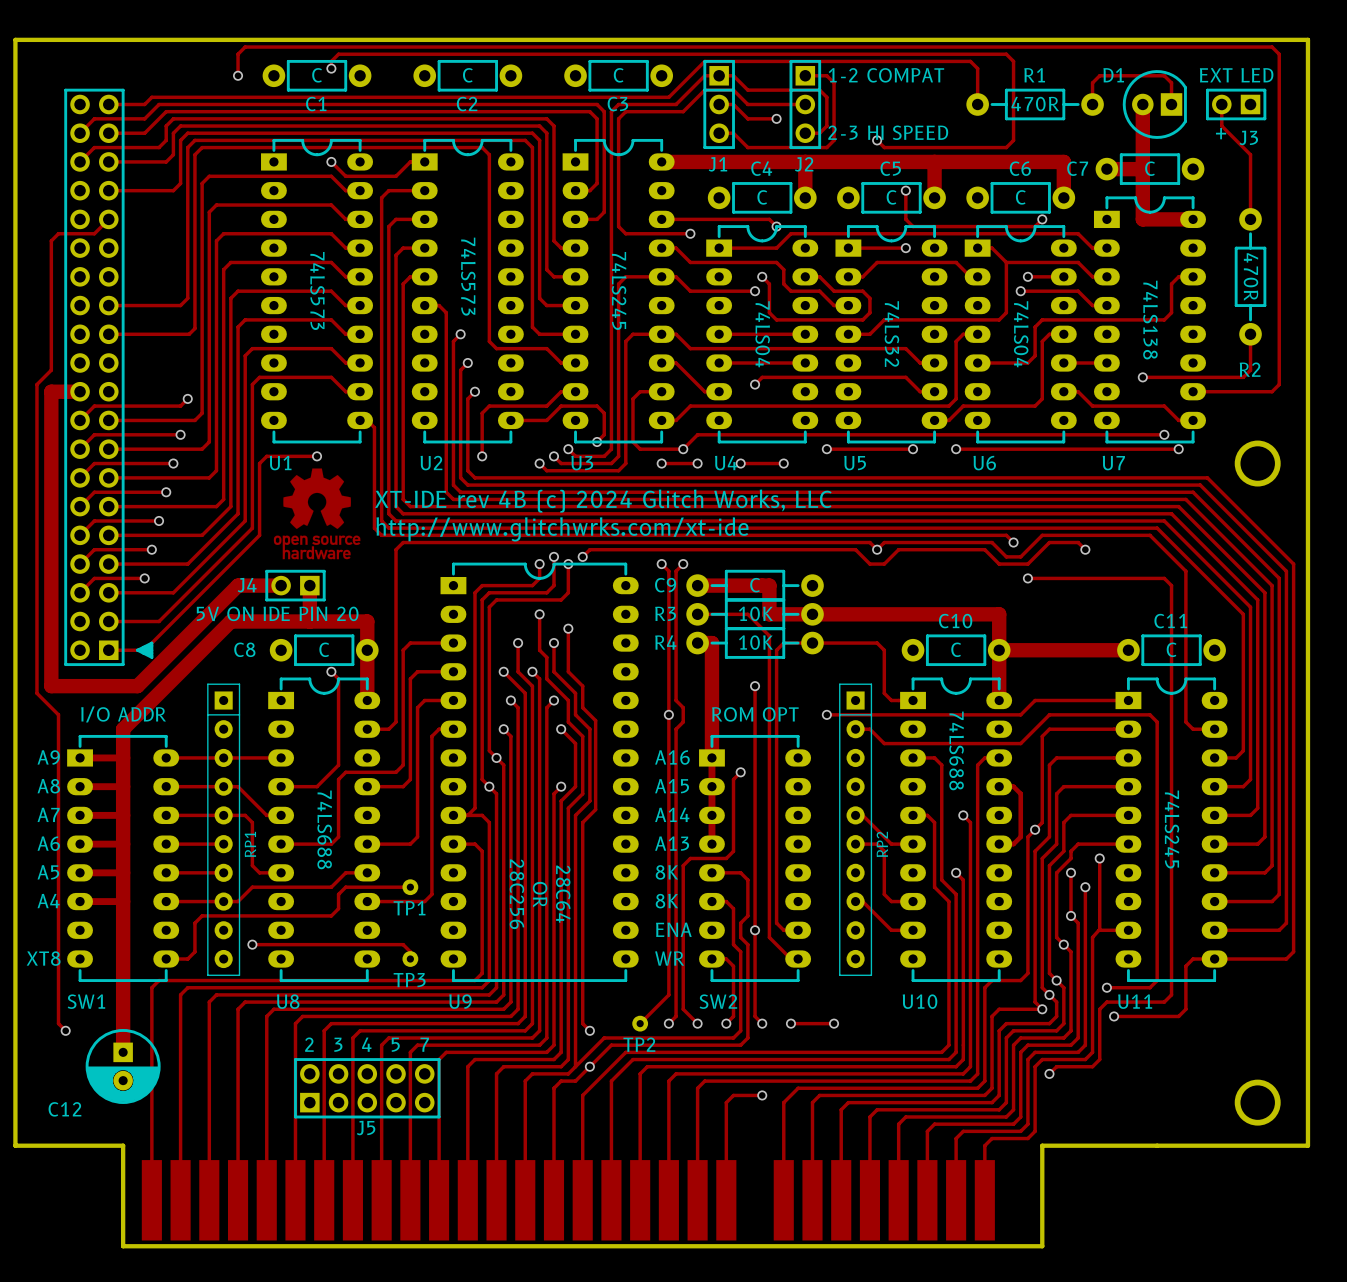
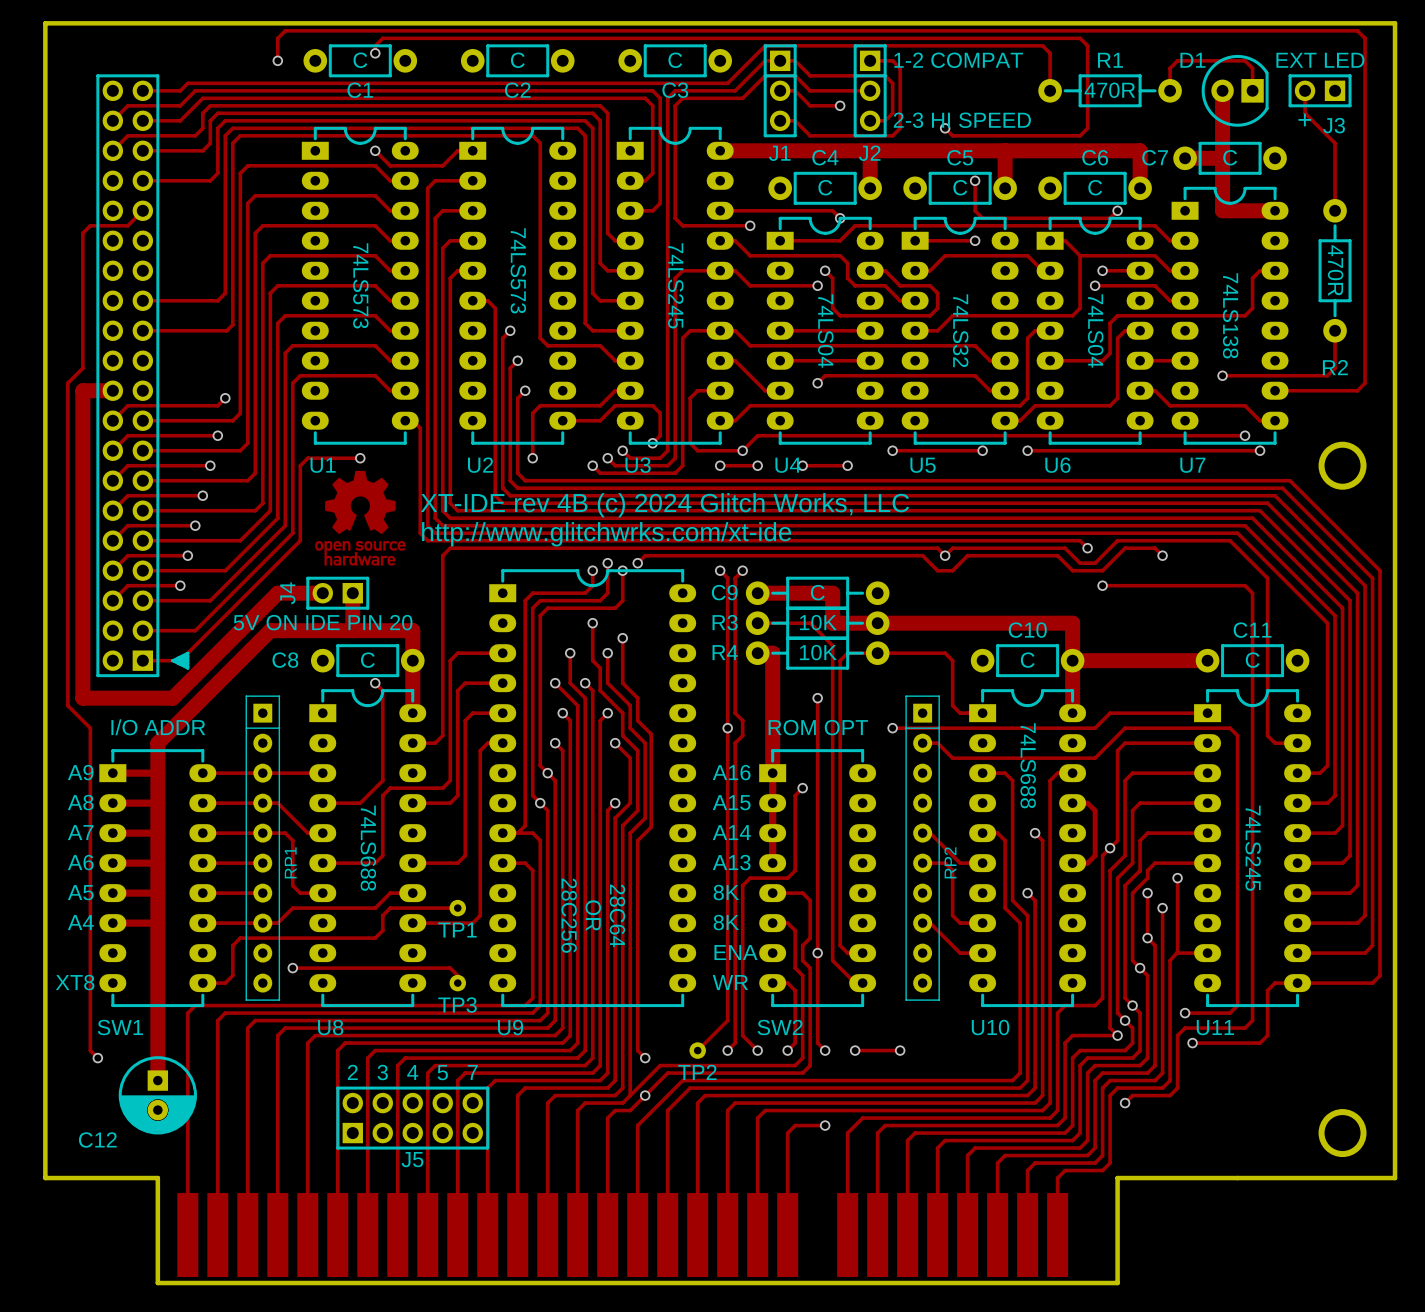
J4 name rotation: 0° (247, 585) -> 90° counterclockwise (287, 593)

